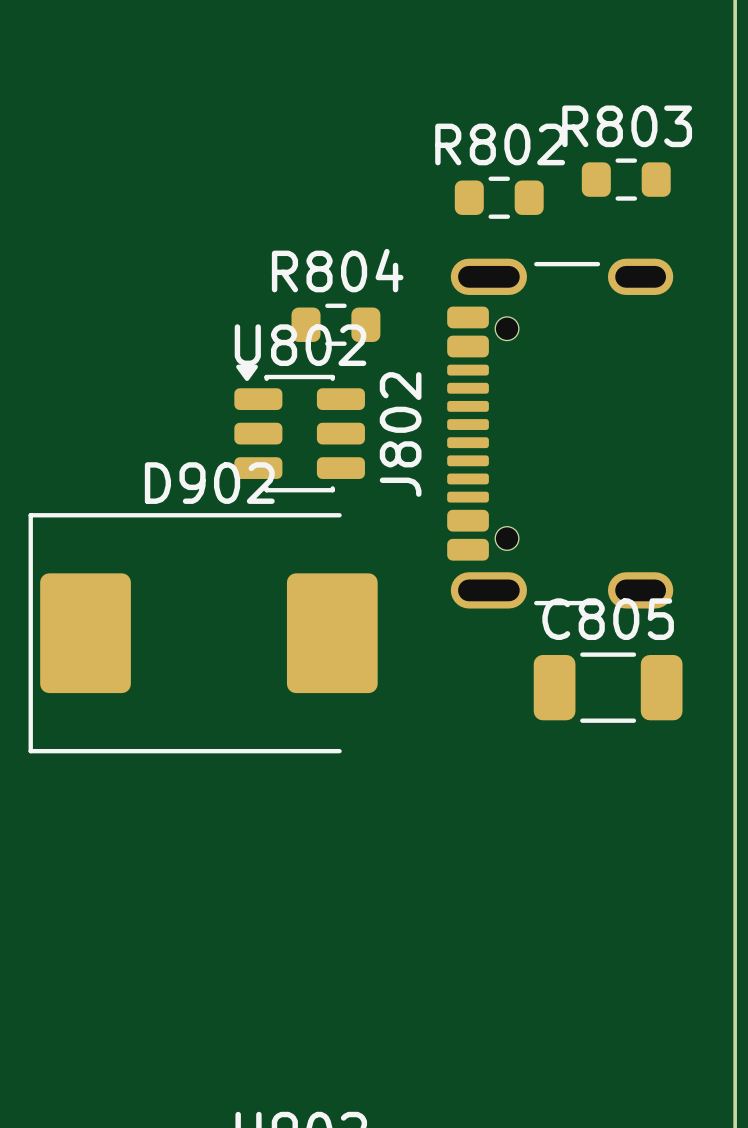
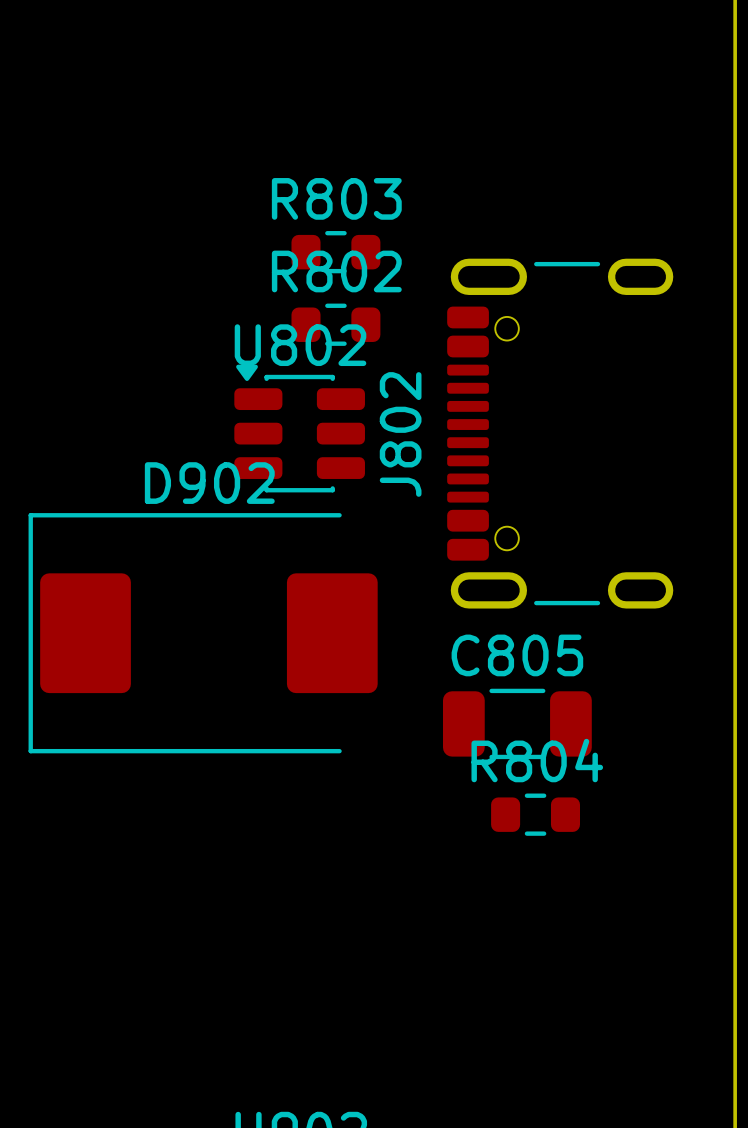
R803 position: (626, 179) -> (335, 252)
R802: (499, 197) -> none
R804 name: R804 (337, 270) -> R802 (336, 271)
C805 position: (608, 687) -> (517, 723)
R804: none -> (535, 814)

